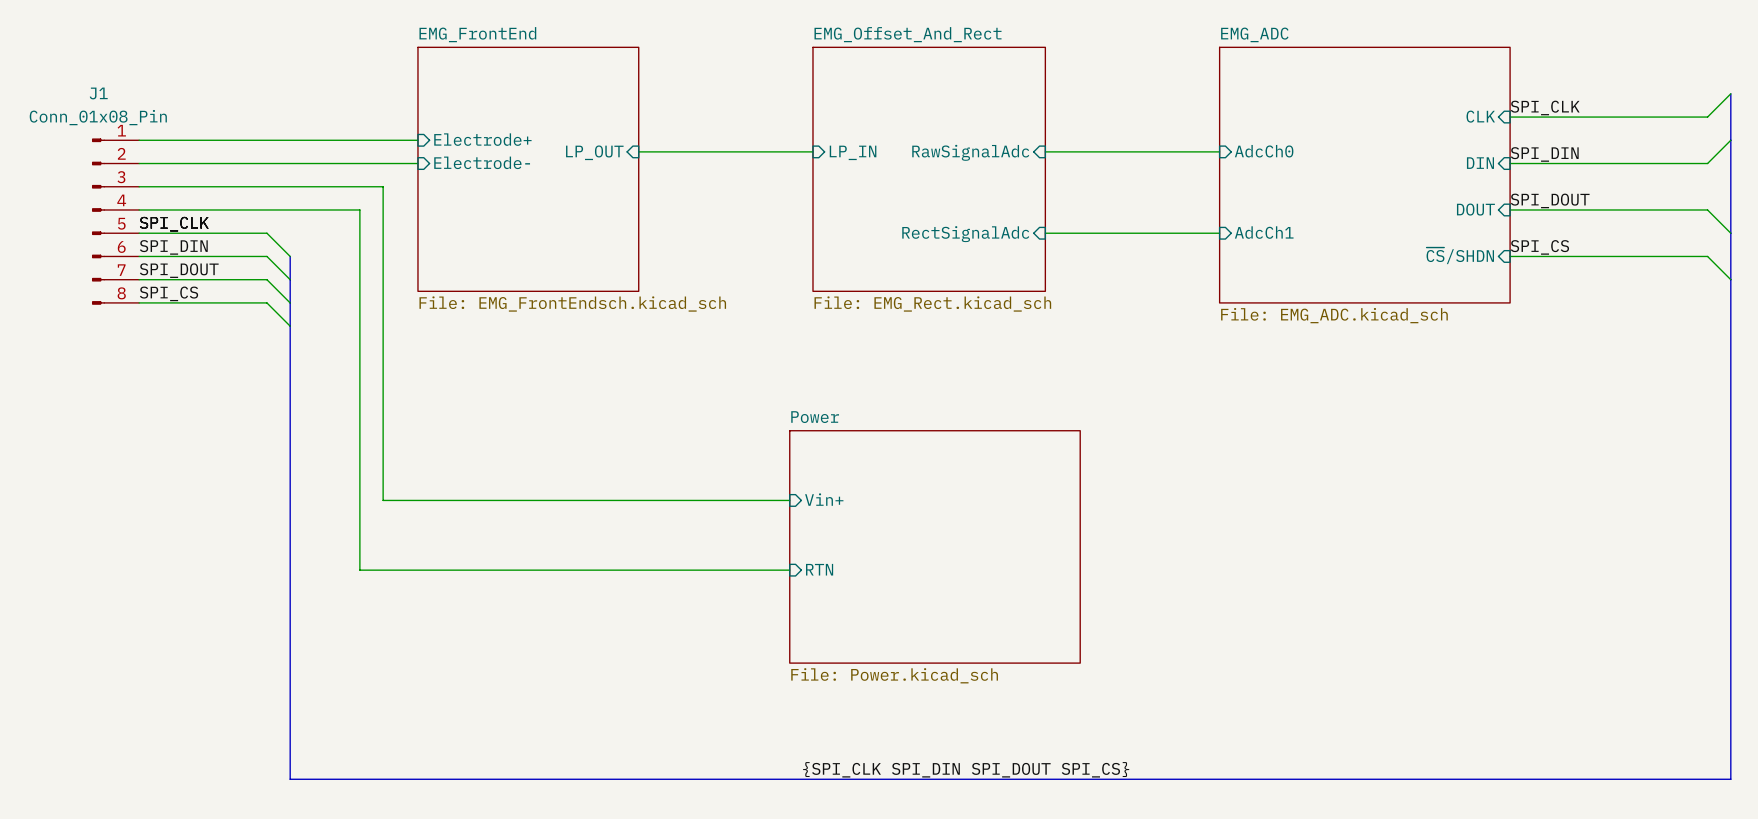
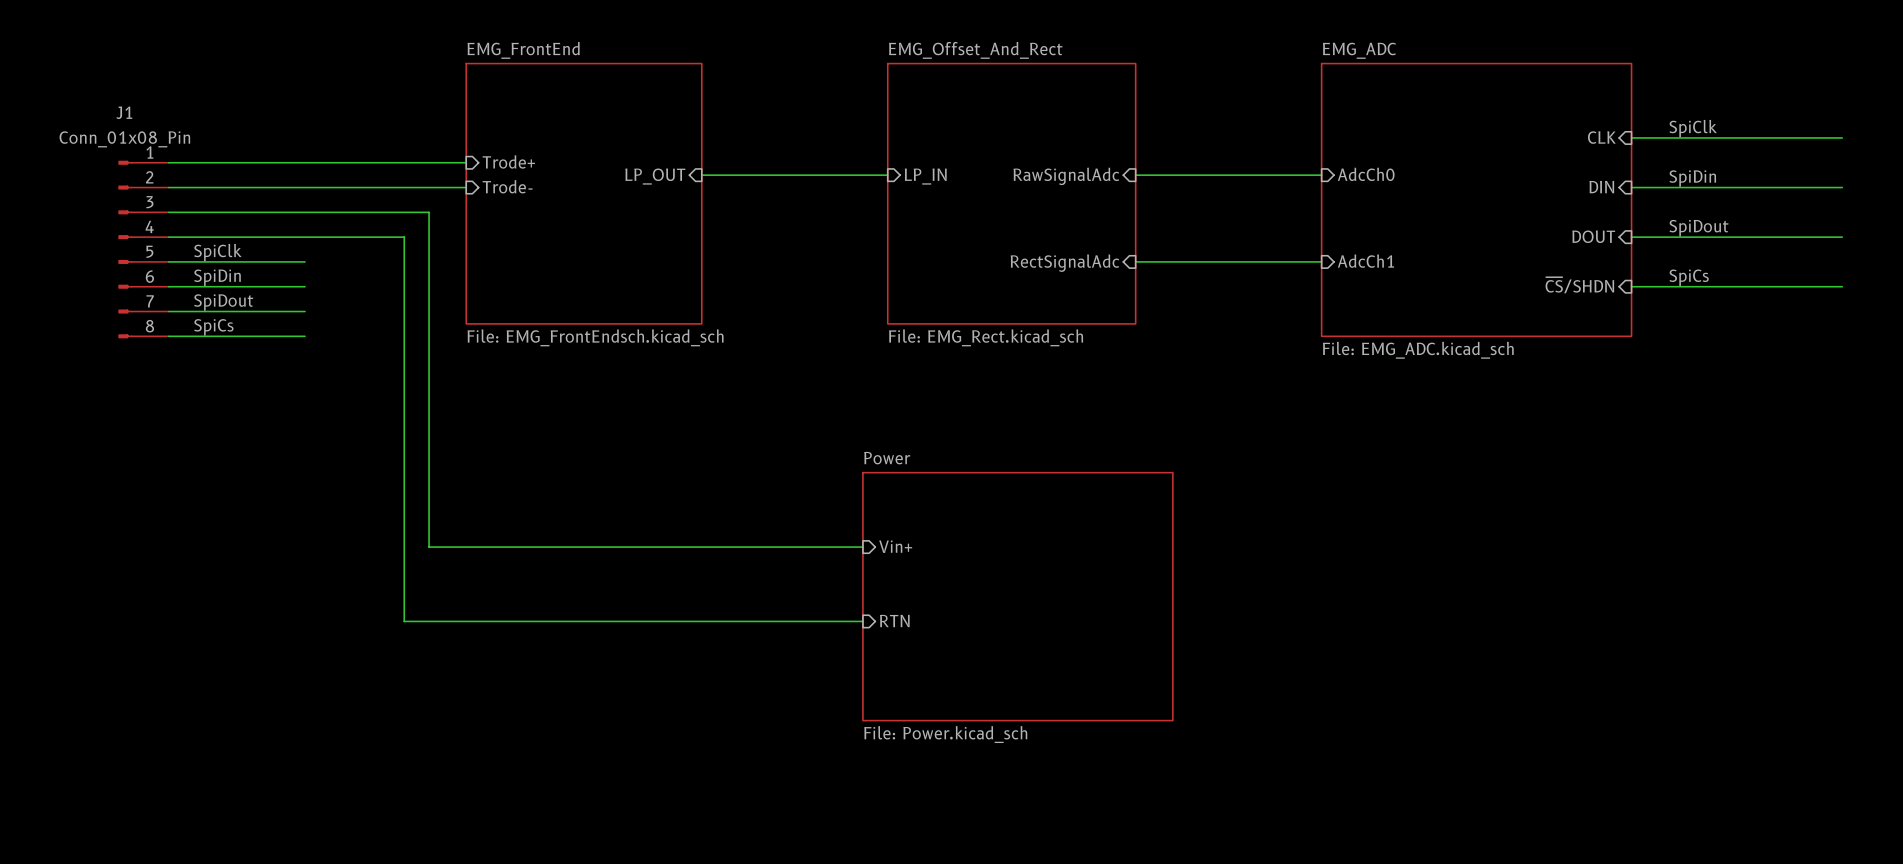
wire: (1730, 93) (1707, 117) -> none
bus: (1730, 93) (1730, 779) (290, 779) (290, 256) -> none
label: SPI_CLK (1545, 107) -> none
label: none -> SpiClk (1693, 128)
sheet pin: Electrode+ (482, 139) -> Trode+ (508, 161)
wire: (1730, 140) (1707, 163) -> none
label: SPI_DIN (1544, 154) -> none
label: none -> SpiDin (1692, 178)
sheet pin: Electrode- (482, 162) -> Trode- (507, 186)
label: SPI_DOUT (1550, 200) -> none
label: none -> SpiDout (1698, 228)
wire: (1707, 209) (1730, 233) -> none
label: SPI_CLK (174, 224) -> none
label: none -> SpiClk (217, 252)
wire: (266, 233) (290, 256) -> none
label: SPI_DIN (173, 247) -> none
label: none -> SpiDin (217, 277)
label: SPI_CS (1539, 247) -> none
label: none -> SpiCs (1689, 277)
wire: (266, 256) (290, 279) -> none
wire: (1707, 256) (1730, 279) -> none
label: SPI_DOUT (179, 270) -> none
label: none -> SpiDout (223, 302)
wire: (266, 279) (290, 302) -> none
label: SPI_CS (169, 293) -> none
label: none -> SpiCs (213, 327)
wire: (266, 302) (290, 326) -> none
label: {SPI_CLK SPI_DIN SPI_DOUT SPI_CS} (966, 769) -> none

